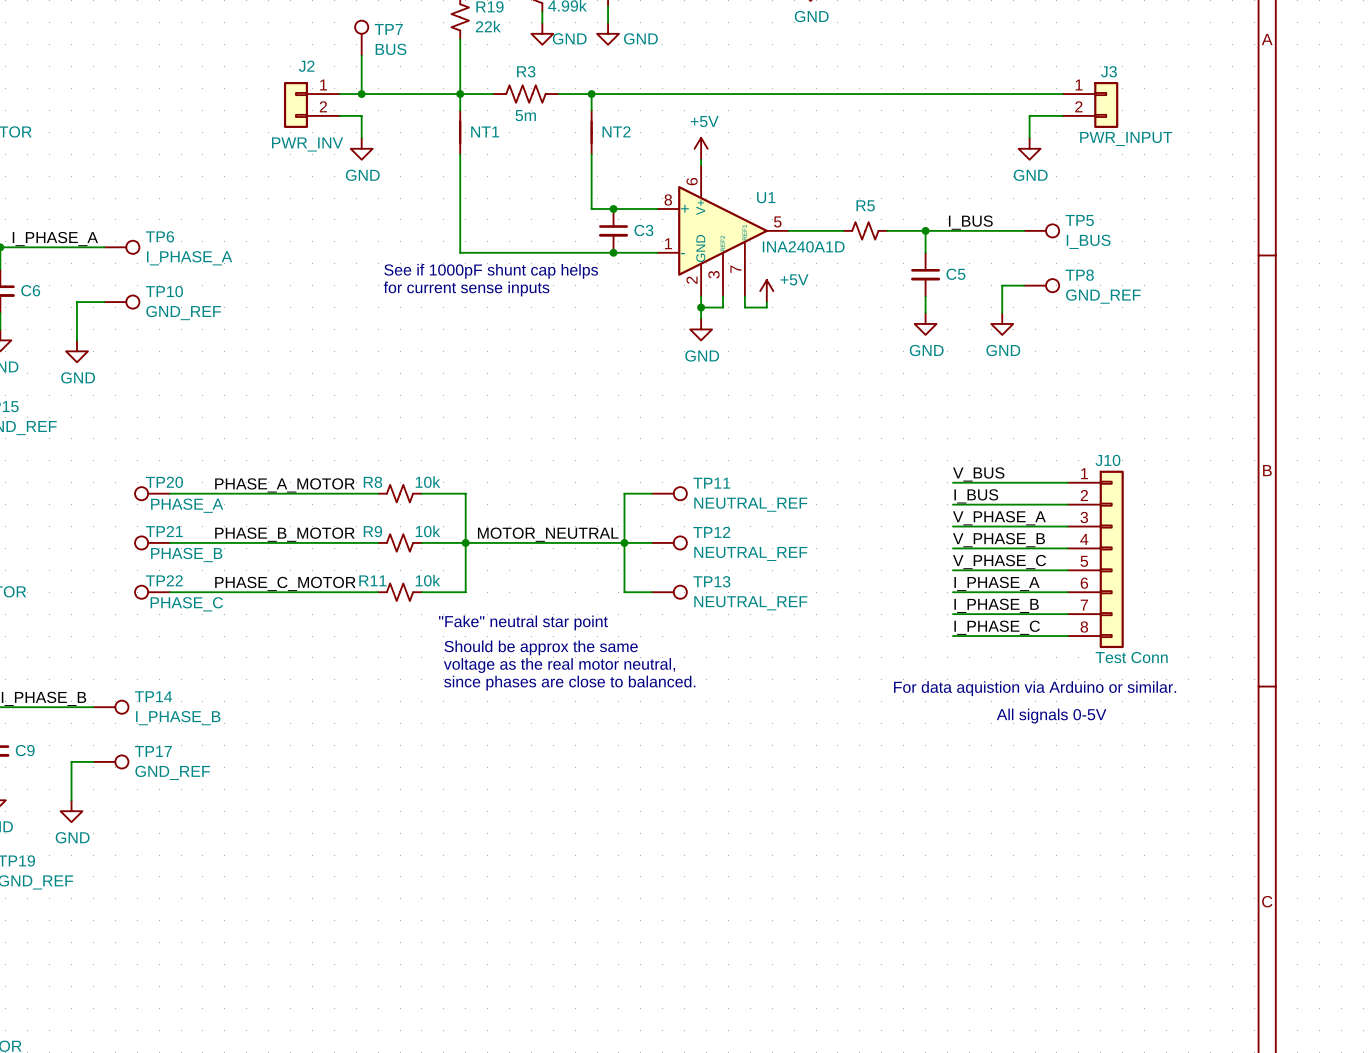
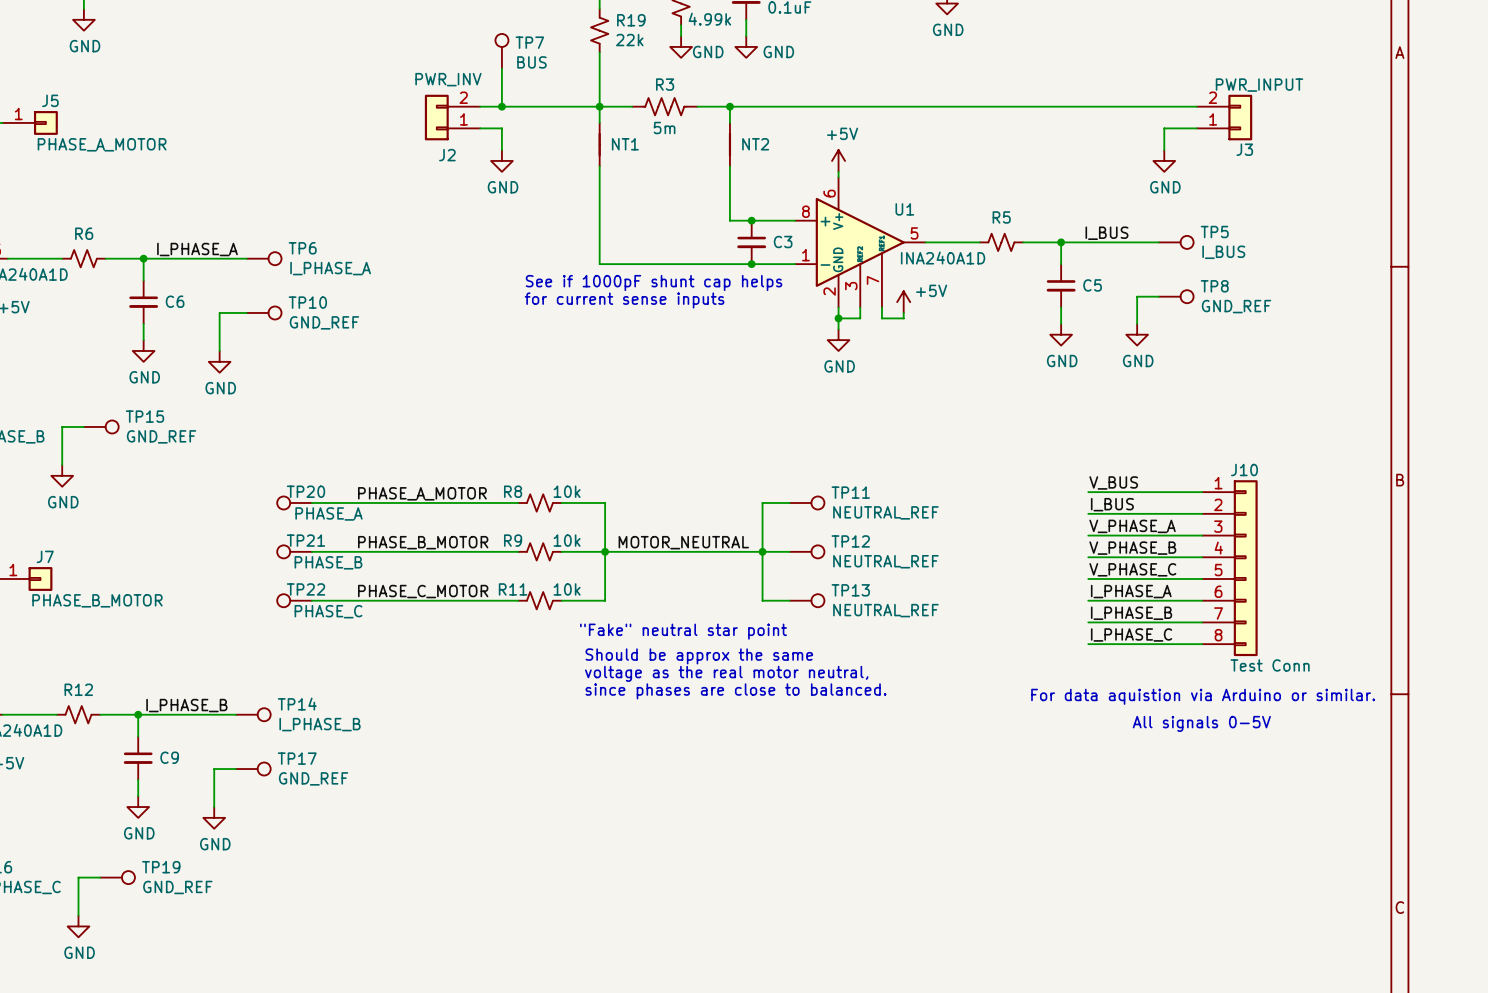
J2 flip: as is (295, 104) -> up-down (436, 117)
J3 flip: as is (1106, 104) -> up-down (1240, 117)

